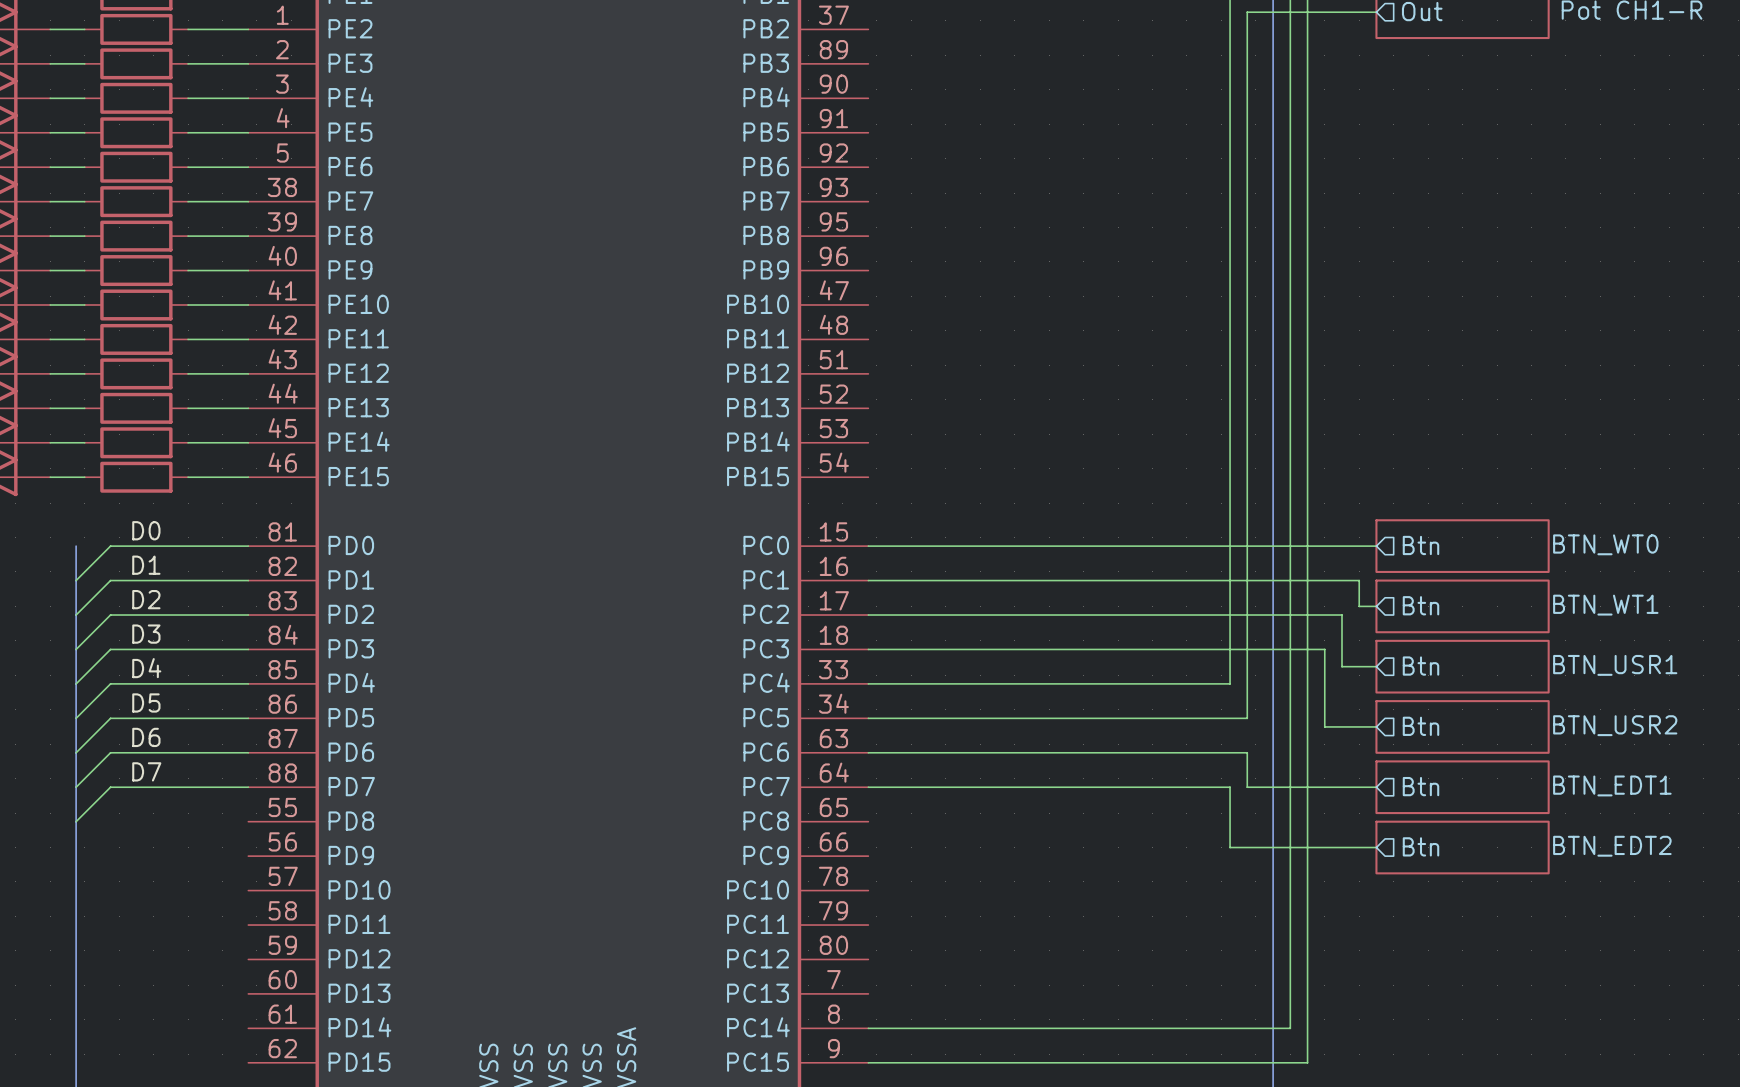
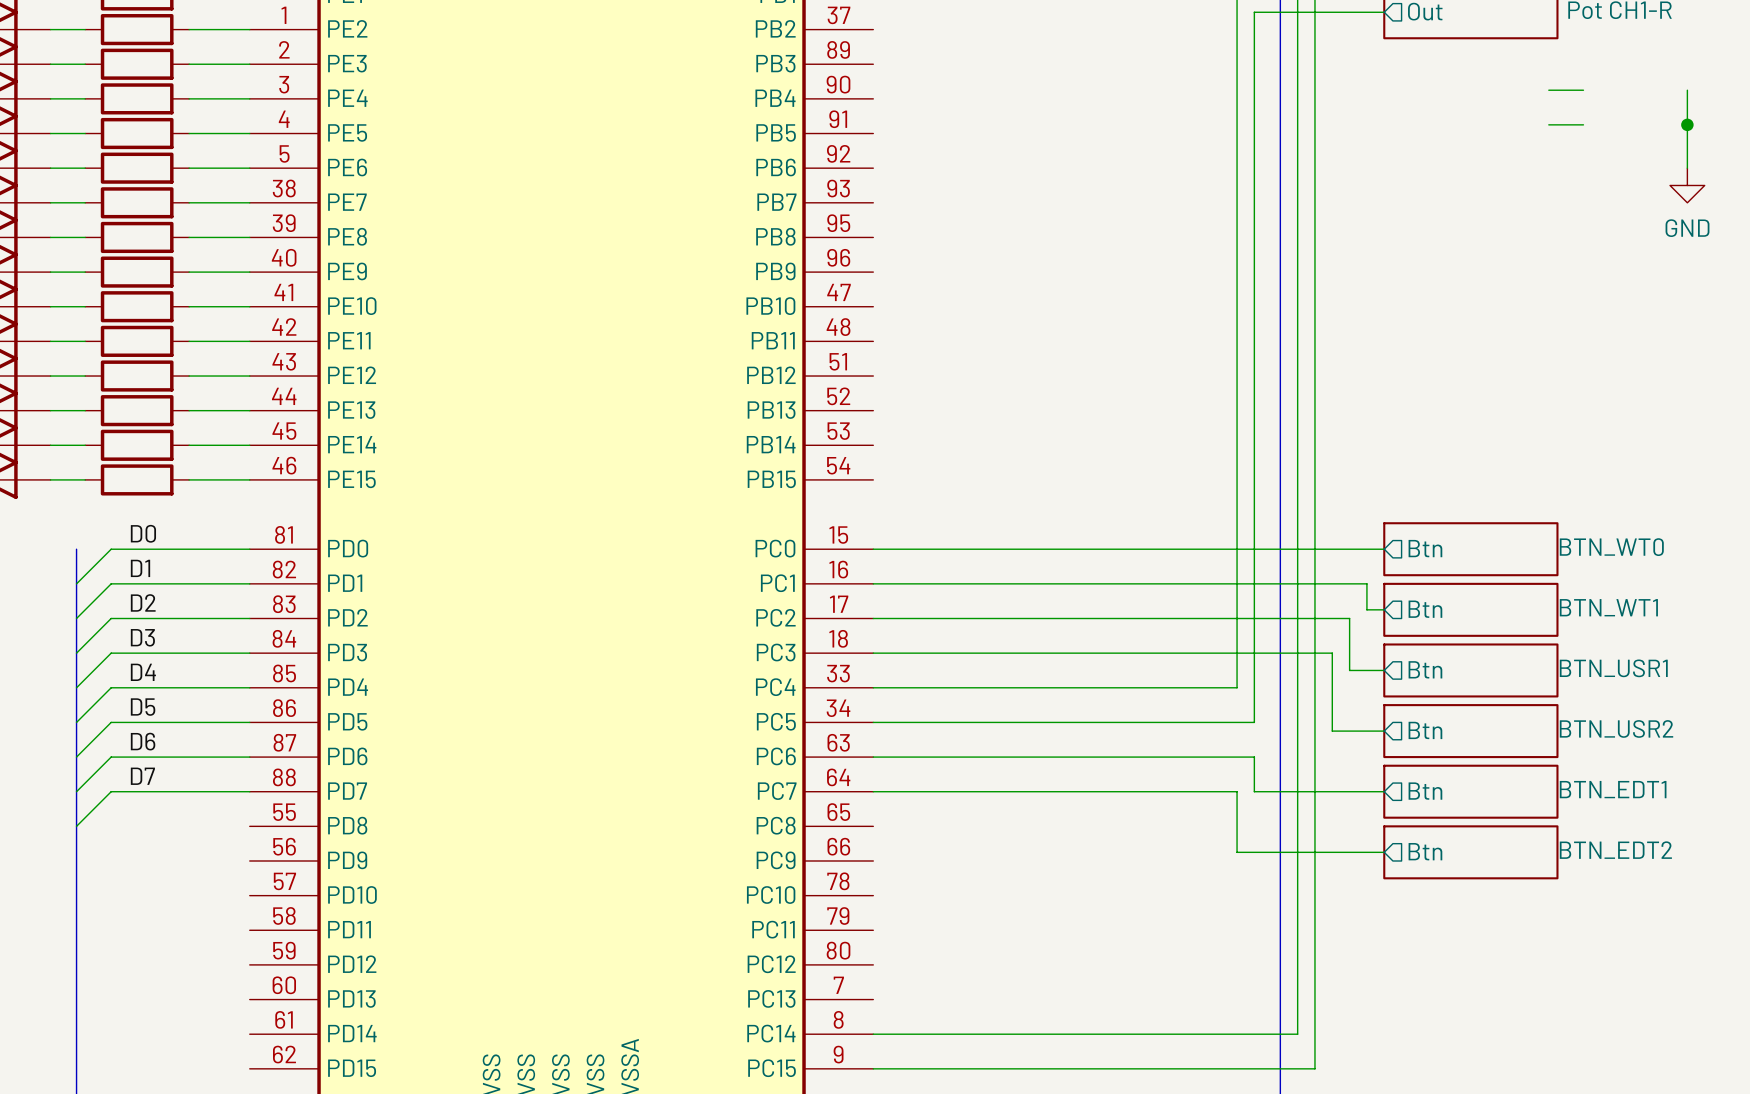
wire: none -> (1548, 90) (1583, 90)
wire: none -> (1687, 90) (1687, 168)
wire: none -> (1548, 124) (1583, 124)
junction: none -> (1687, 124)
power symbol: none -> GND (1687, 185)

